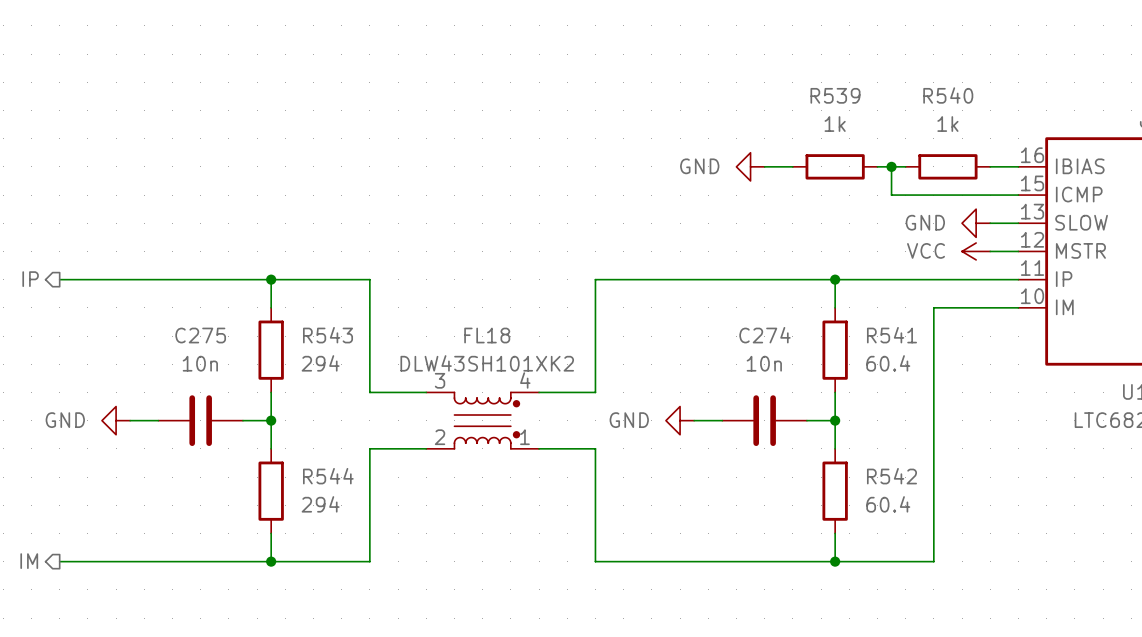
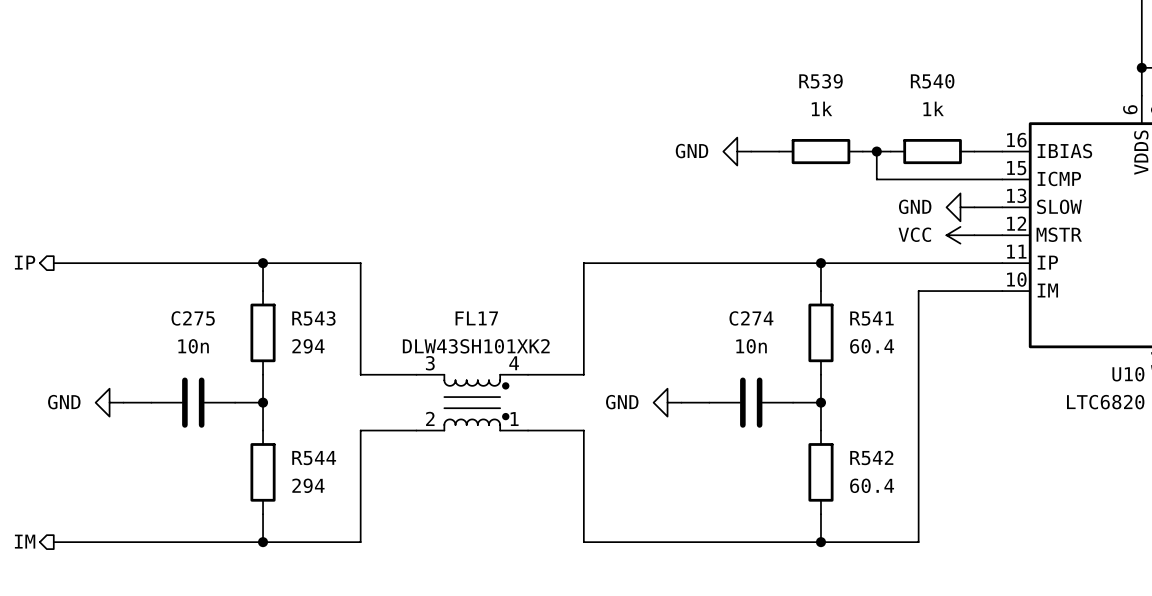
FL18 name: FL18 (487, 335) -> FL17 (476, 318)

